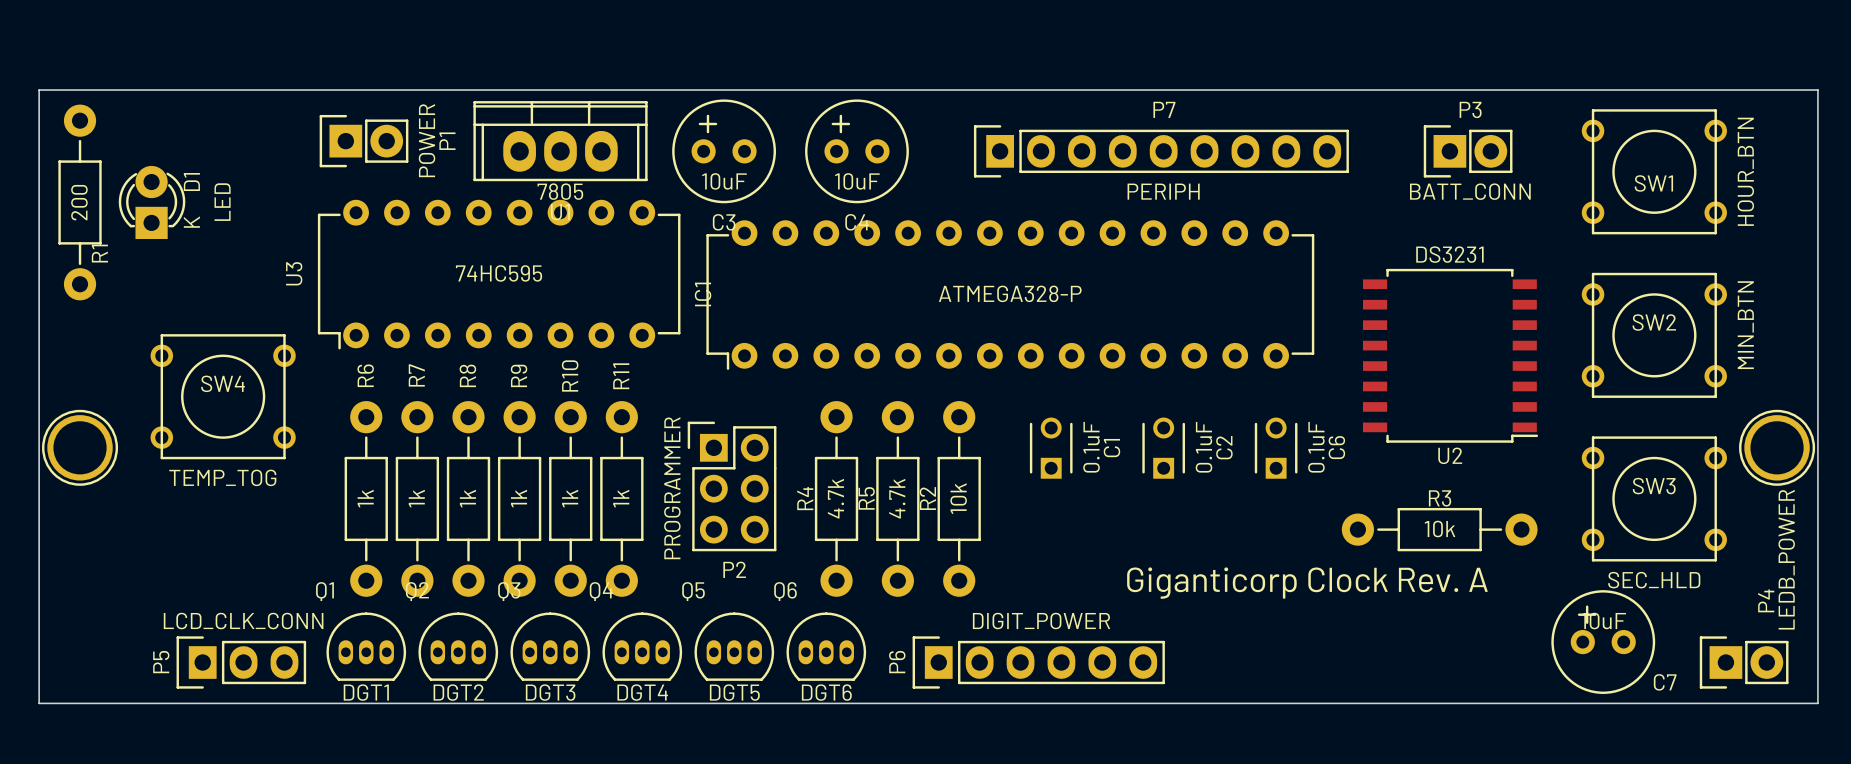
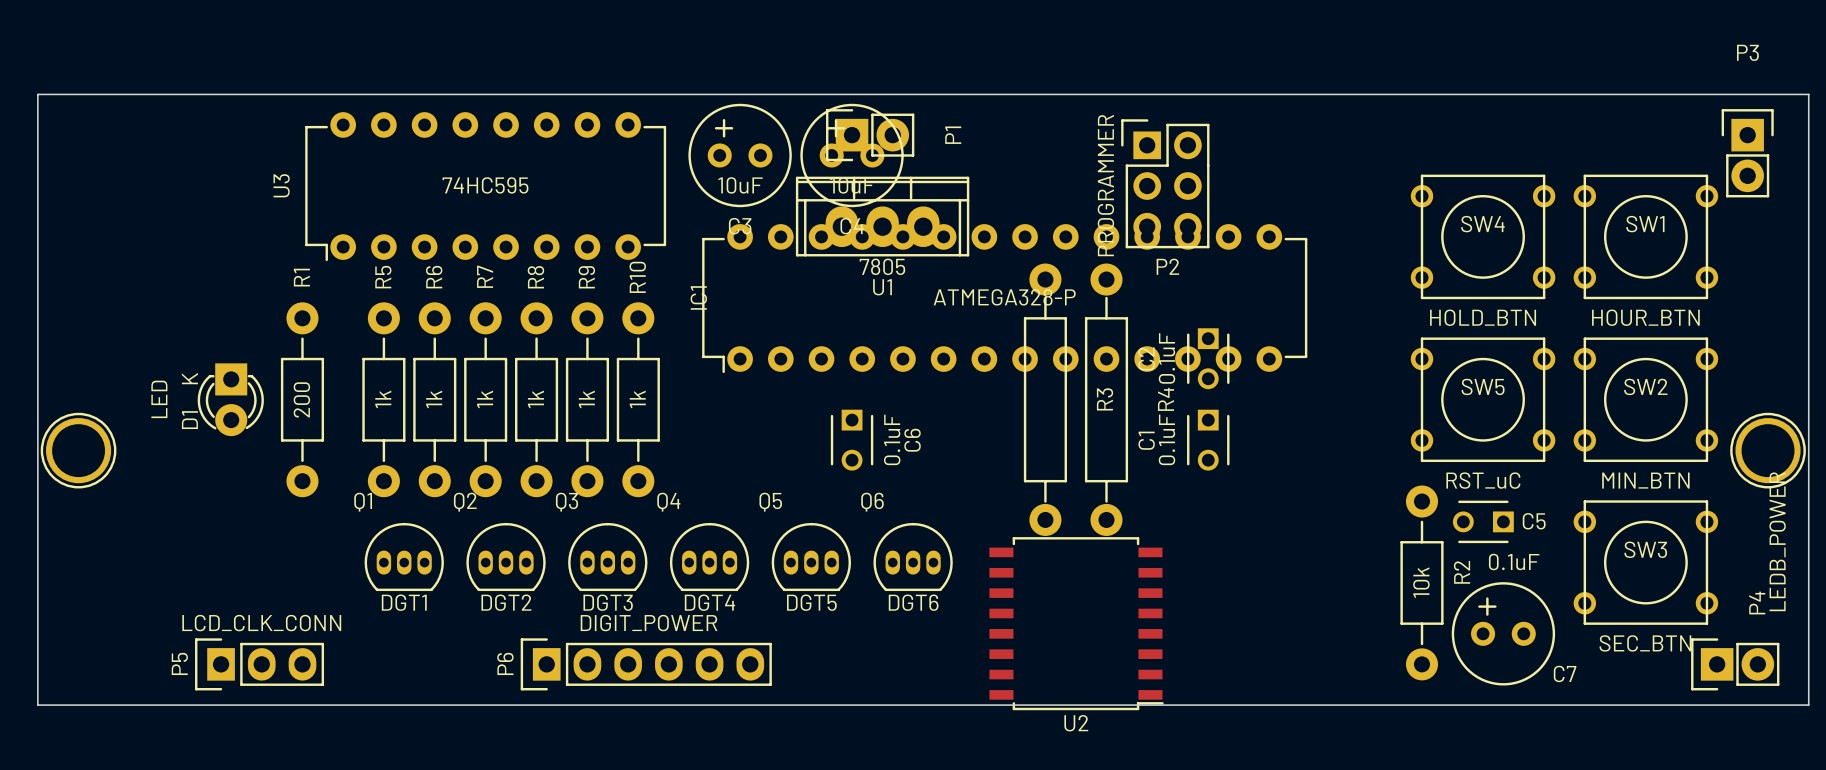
P3 name position: P3 (1470, 109) -> P3 (1747, 52)
P1 value: POWER (427, 140) -> none
P1 position: (364, 141) -> (870, 135)
U1 position: (560, 141) -> (882, 216)
C3 position: (724, 151) -> (740, 155)
P7: PERIPH (1161, 151) -> none
P3 rotation: 0° (1468, 151) -> 90° clockwise (1747, 153)
P3 position: (1468, 151) -> (1747, 153)
SW1 position: (1654, 171) -> (1645, 236)
SW1 value rotation: 0° (1745, 171) -> 90° clockwise (1645, 317)
SW1 name position: SW1 (1653, 183) -> SW1 (1645, 224)
P3 value: BATT_CONN (1470, 191) -> none
R1 position: (80, 202) -> (302, 399)
D1 rotation: 0° (152, 202) -> 180° (230, 399)
D1 position: (152, 202) -> (230, 399)
R1 name position: R1 (99, 253) -> R1 (301, 277)
U2 value: DS3231 (1449, 254) -> none
U3 position: (499, 274) -> (485, 186)
SW2 value rotation: 0° (1745, 325) -> 90° clockwise (1645, 480)
SW2 value position: MIN_BTN (1745, 325) -> MIN_BTN (1645, 480)
SW2 position: (1654, 335) -> (1645, 399)
U2 position: (1450, 355) -> (1076, 623)
SW4 position: (223, 396) -> (1483, 236)
SW5: none -> RST_uC (1483, 399)
R4 footprint: [814, 401, 859, 597] -> [1084, 263, 1129, 536]
C1 rotation: 0° (1051, 448) -> 180° (1208, 440)
C1 position: (1051, 448) -> (1208, 440)
C2 rotation: 0° (1163, 448) -> 180° (1208, 358)
C2 position: (1163, 448) -> (1208, 358)
C6 rotation: 0° (1276, 448) -> 180° (852, 440)
C6 position: (1276, 448) -> (852, 440)
SW4 value: TEMP_TOG (222, 477) -> HOLD_BTN (1483, 317)
P2 position: (732, 486) -> (1165, 183)
R6 position: (366, 498) -> (434, 399)
R7 position: (417, 498) -> (485, 399)
R8 position: (468, 498) -> (536, 399)
R9 position: (519, 498) -> (587, 399)
R10 position: (570, 498) -> (638, 399)
R11: 1k (621, 498) -> none
R4 name position: R4 (805, 498) -> R4 (1165, 399)
R4 value: 4.7k (835, 498) -> none
R5 name position: R5 (866, 498) -> R5 (383, 277)
R5 position: (897, 498) -> (383, 399)
R5 value: 4.7k (897, 498) -> 1k (383, 399)
R2 name position: R2 (927, 498) -> R2 (1462, 572)
R2 position: (959, 498) -> (1421, 582)
R3 name position: R3 (1440, 498) -> R3 (1105, 399)
SW3 position: (1654, 498) -> (1645, 562)
R3 footprint: [1341, 507, 1538, 552] -> [1023, 263, 1067, 536]
C5: none -> 0.1uF (1483, 521)
R3 value: 10k (1440, 529) -> none
P4 value position: LEDB_POWER (1786, 559) -> LEDB_POWER (1777, 541)
SW3 value: SEC_HLD (1654, 580) -> SEC_BTN (1645, 643)
text: Giganticorp Clock Rev. A (1307, 583) -> none
C7 value: 10uF (1603, 621) -> none
C7 position: (1603, 642) -> (1503, 633)
Q1 position: (366, 646) -> (404, 556)
Q2 position: (458, 646) -> (506, 556)
Q3 position: (550, 646) -> (607, 556)
Q4 position: (642, 646) -> (709, 556)
Q5 position: (734, 646) -> (811, 556)
Q6 position: (826, 646) -> (913, 556)
P5 position: (241, 662) -> (259, 664)
P6 position: (1038, 662) -> (646, 664)

